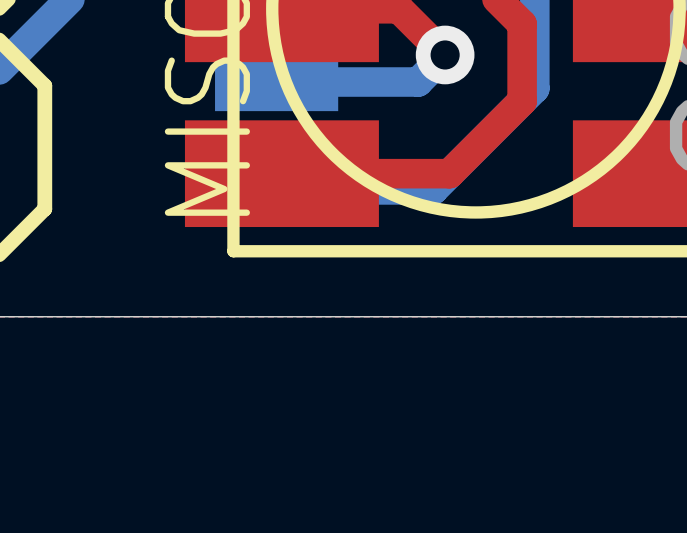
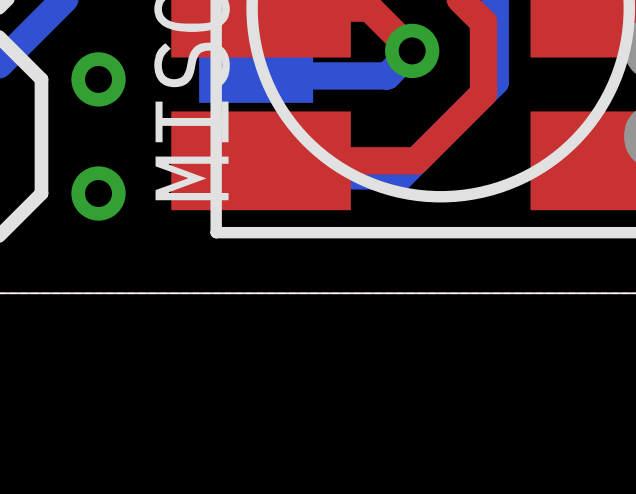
via: none -> (98, 79)
via: none -> (98, 193)

